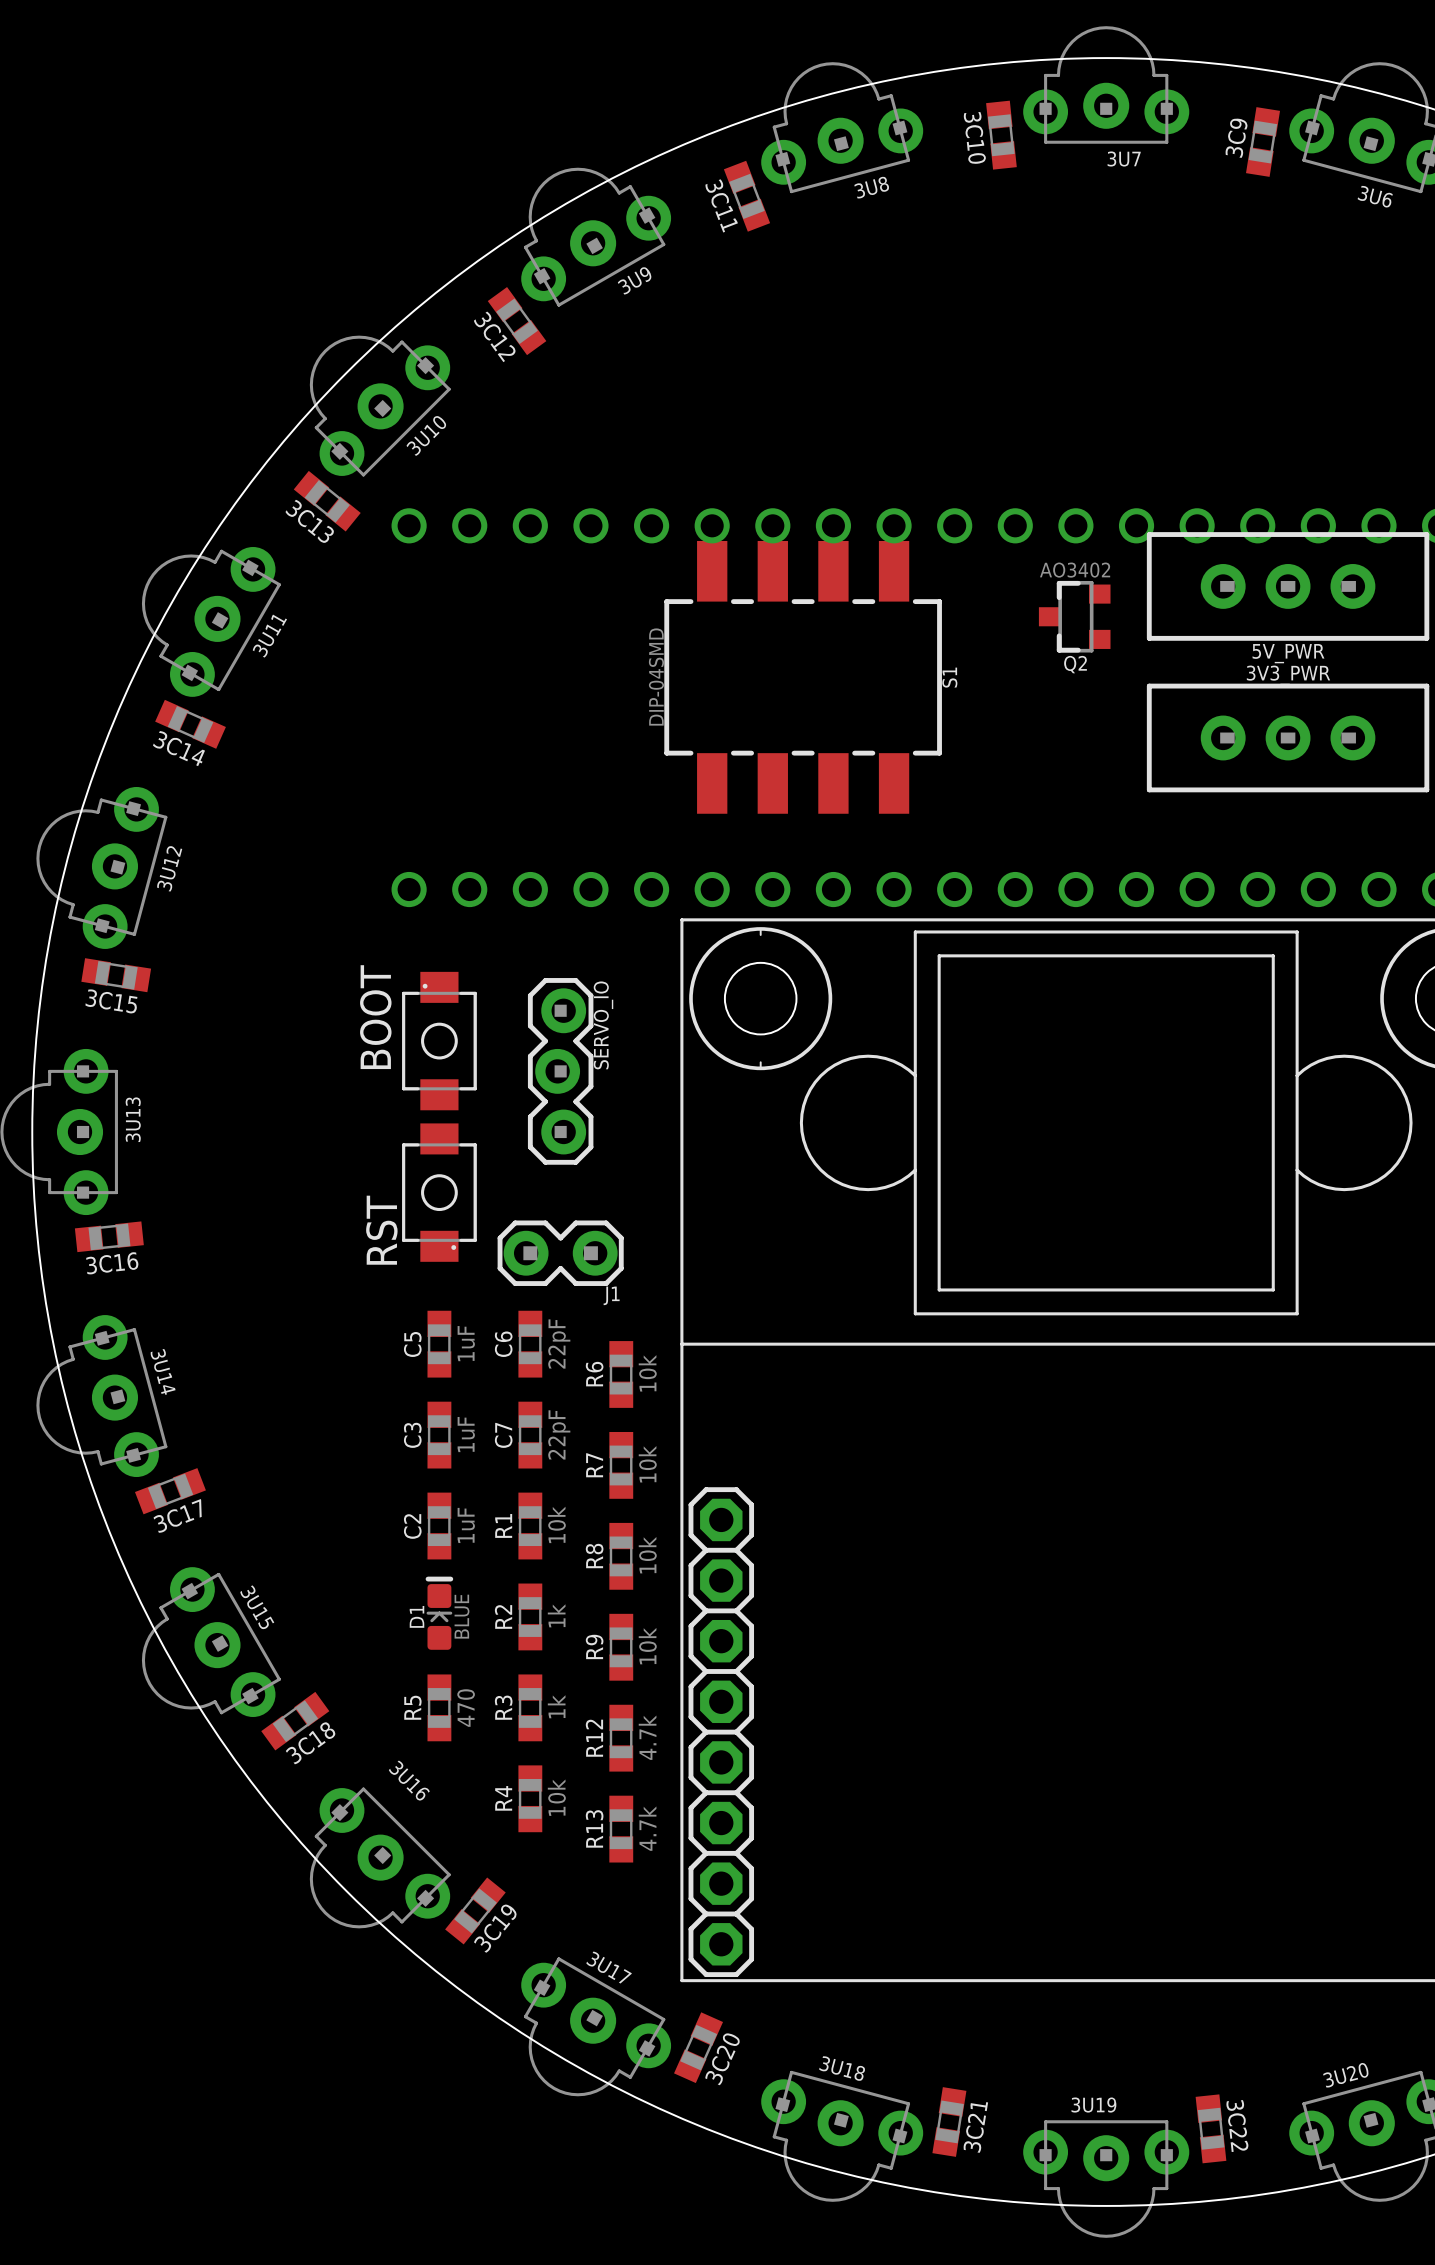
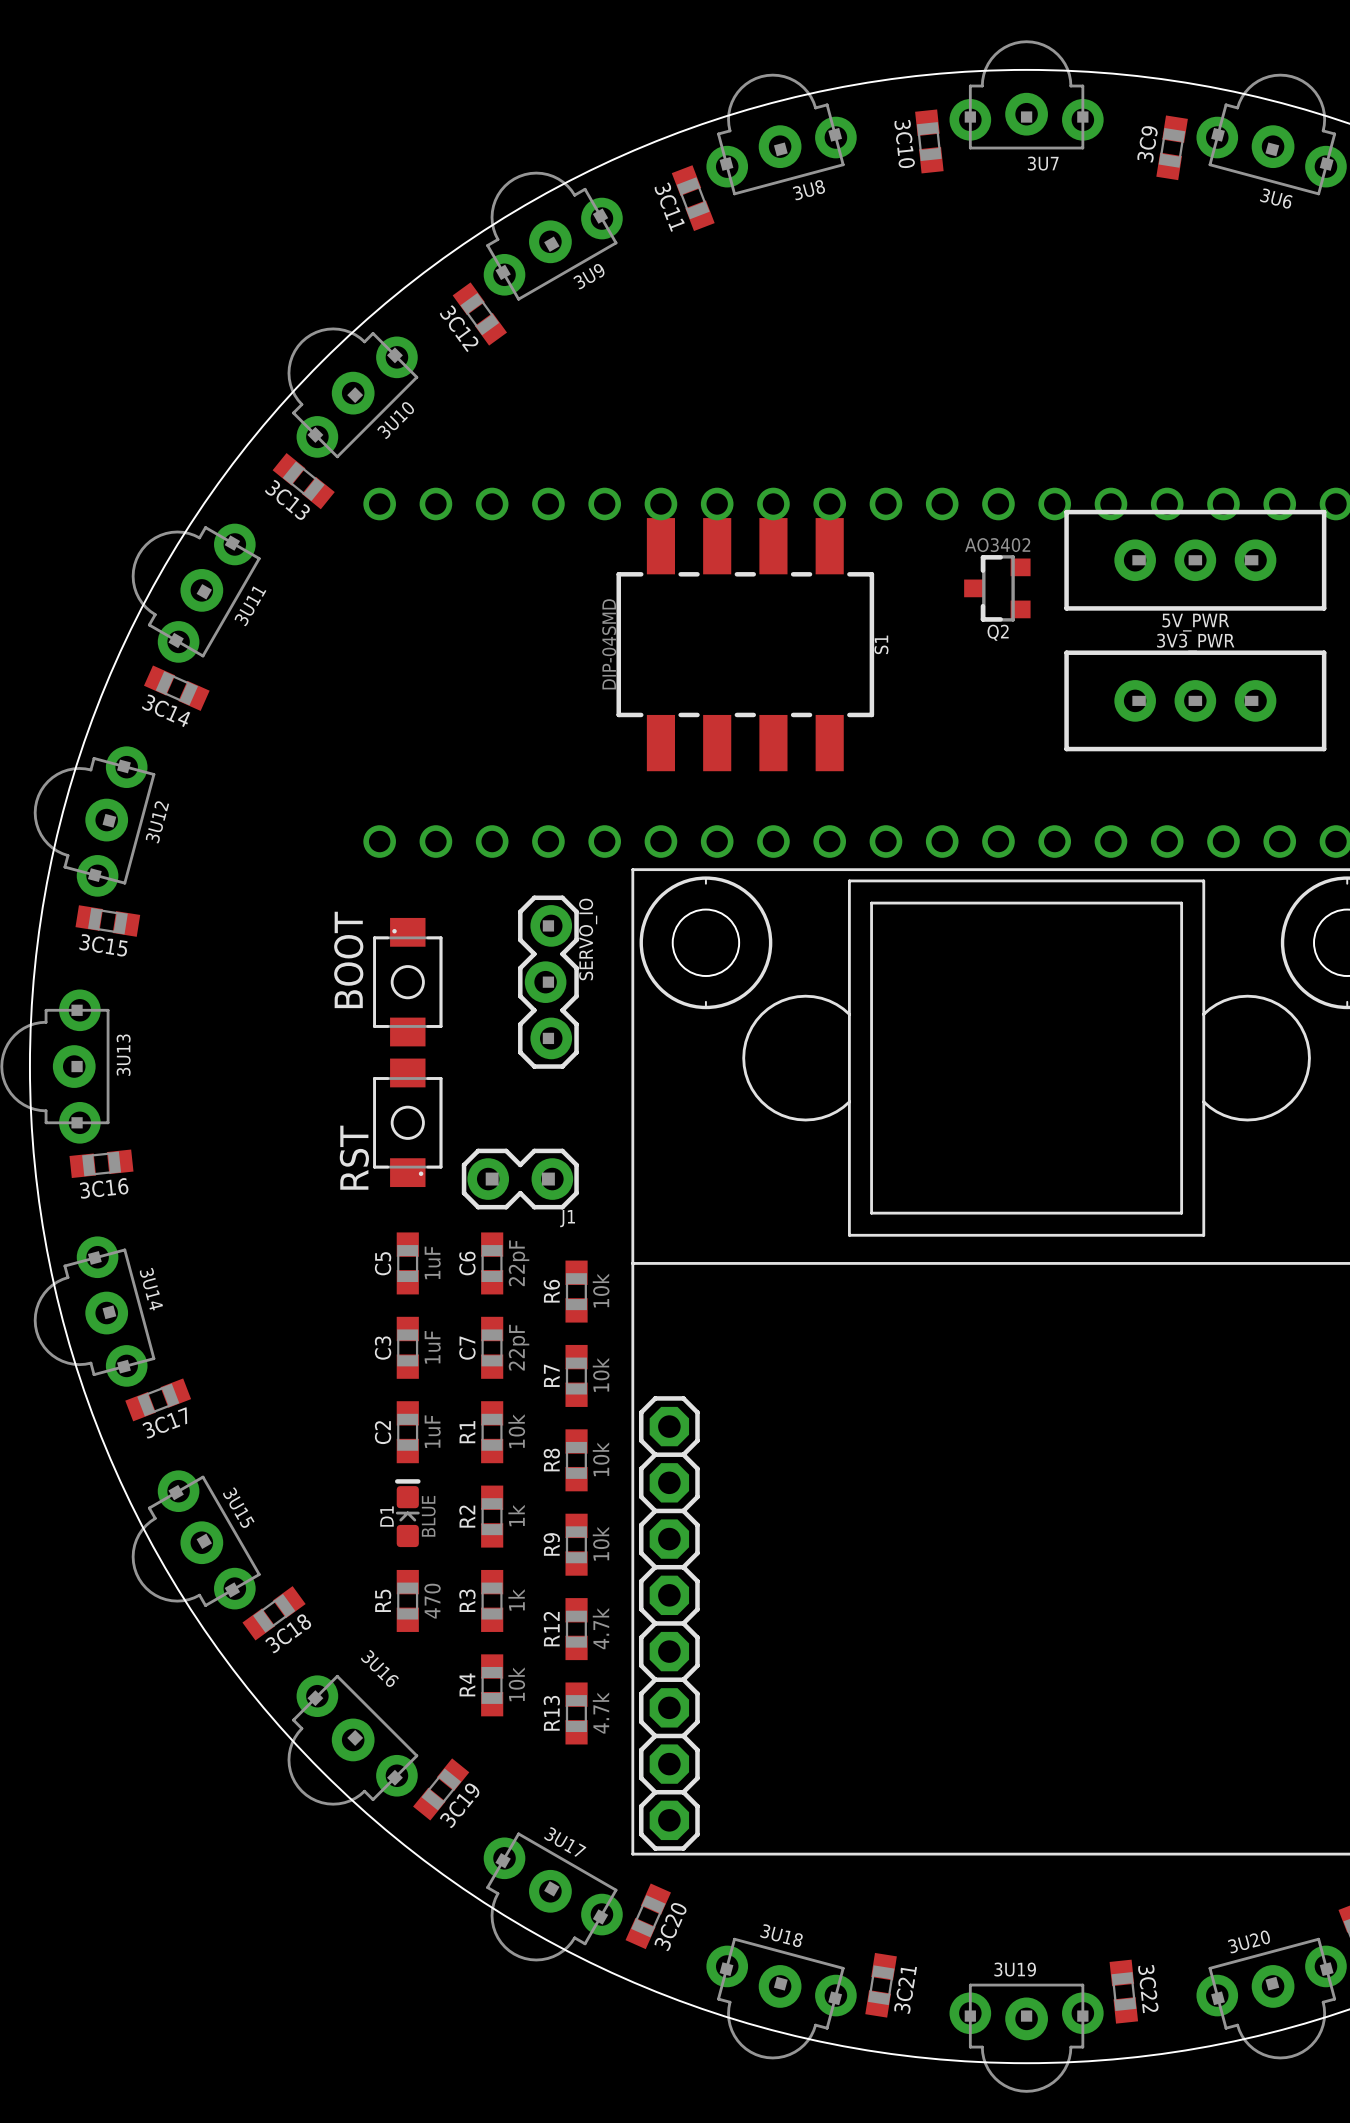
SERVO_IO position: (560, 1071) -> (548, 982)

